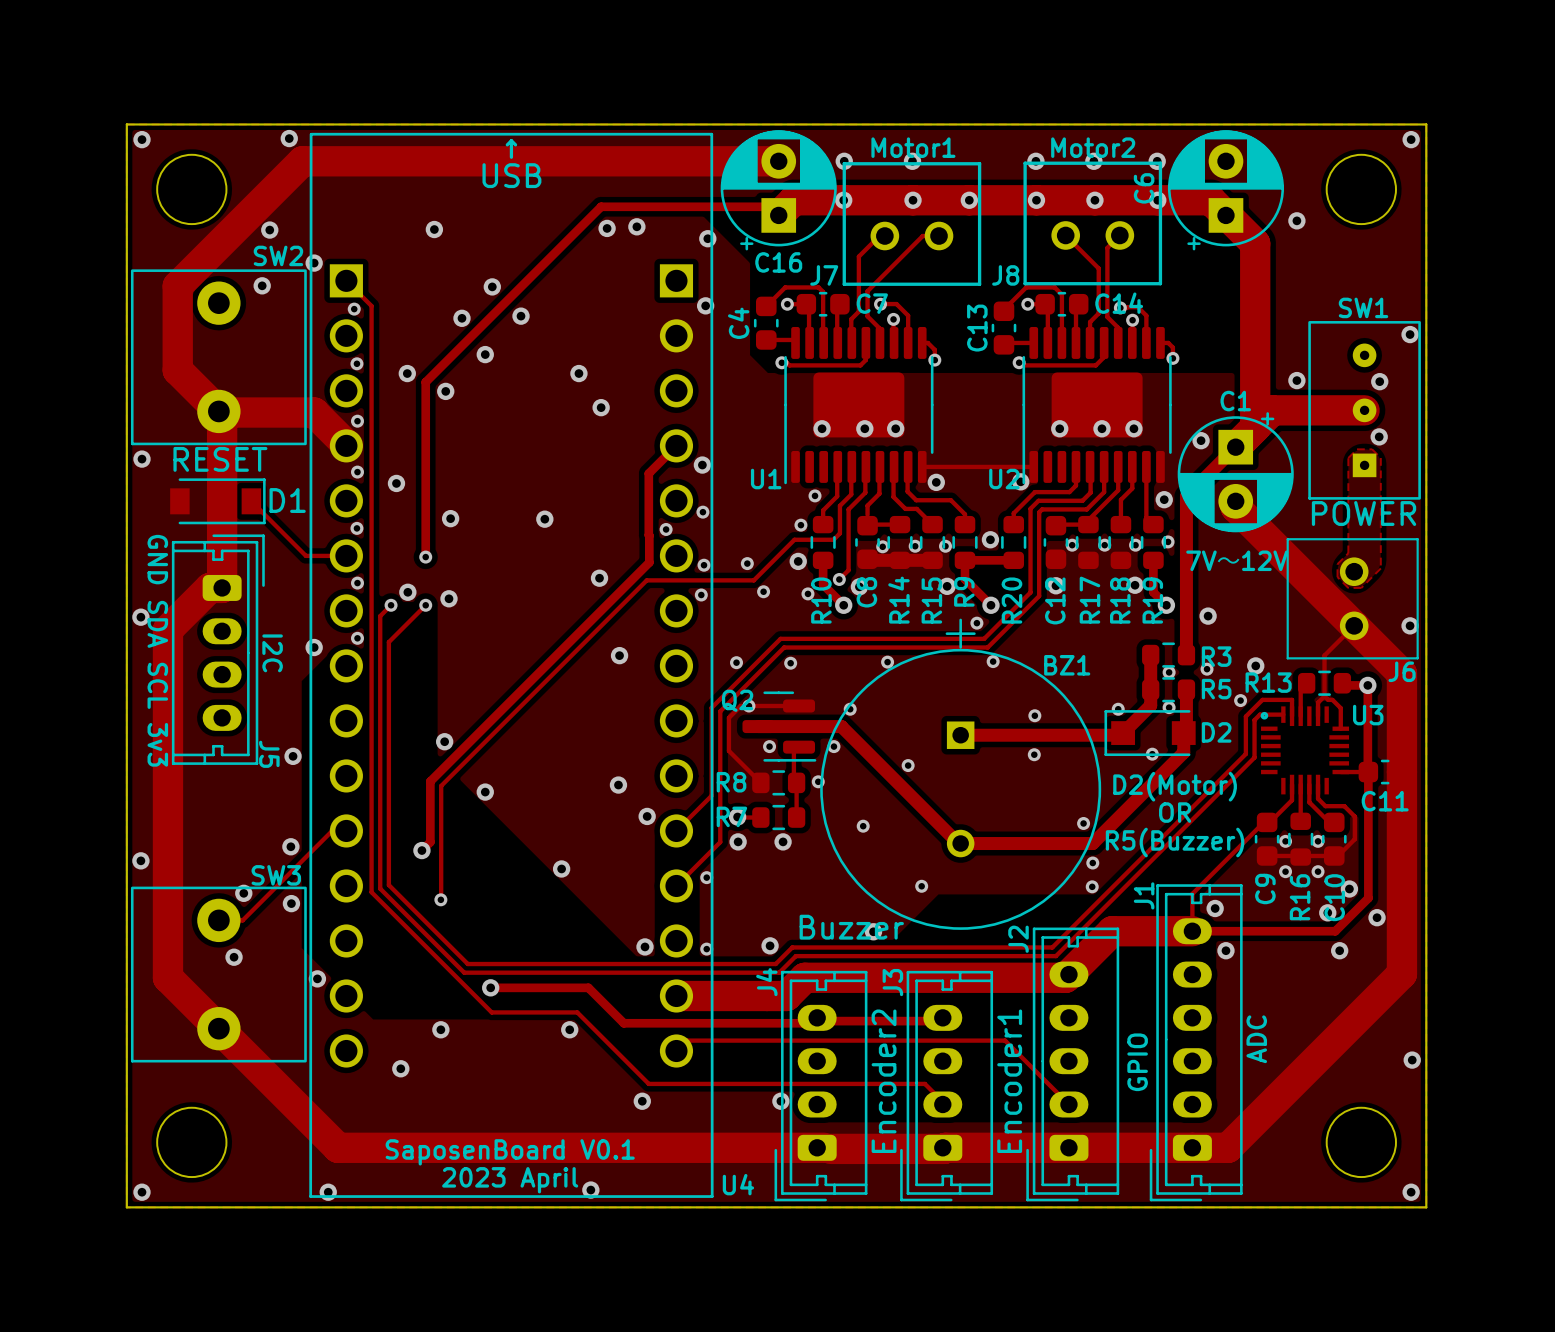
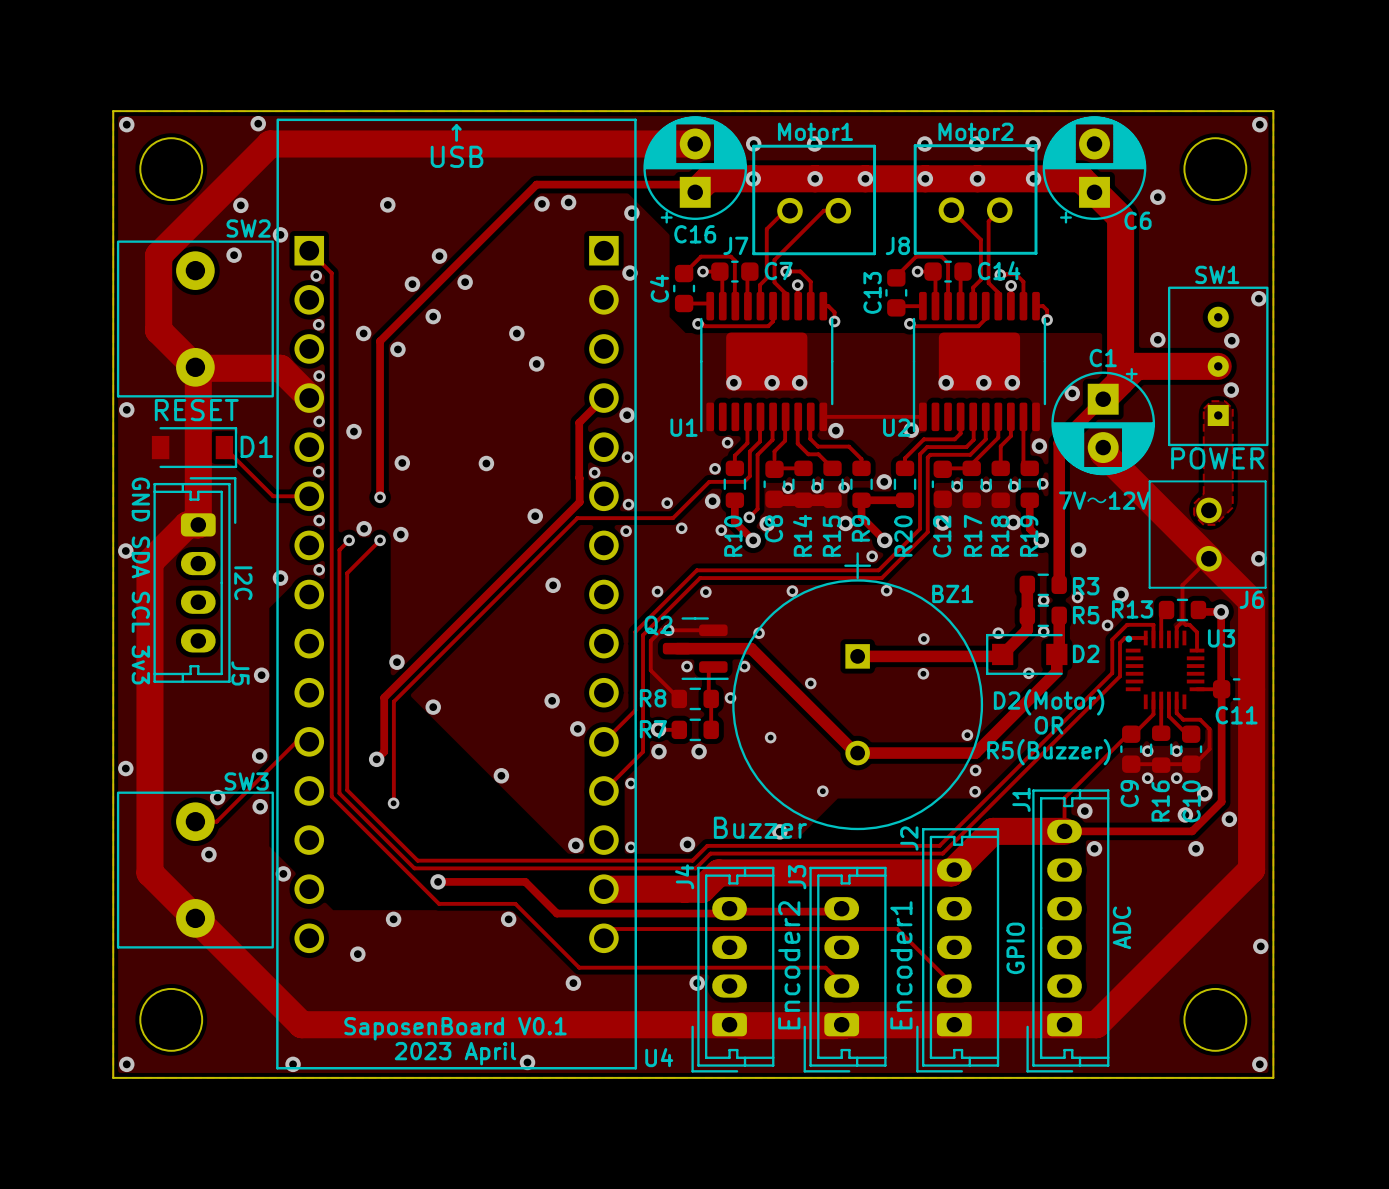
C6 name rotation: 0° (1144, 188) -> 90° clockwise (1138, 220)
C6 name position: C6 (1144, 188) -> C6 (1138, 220)

